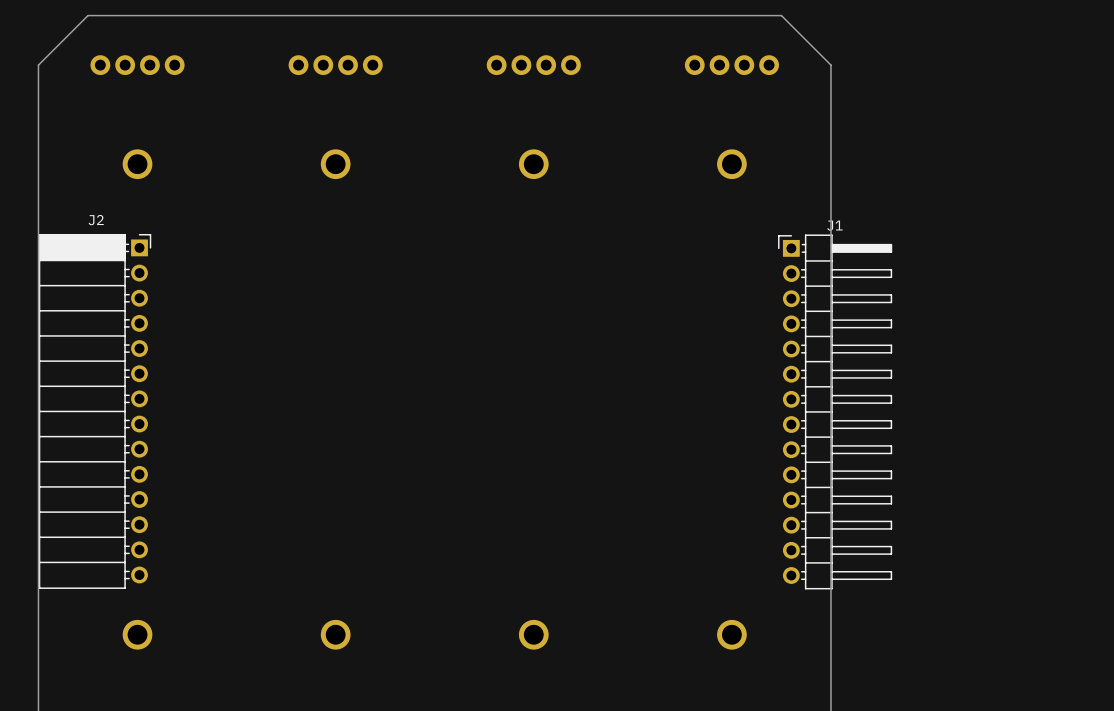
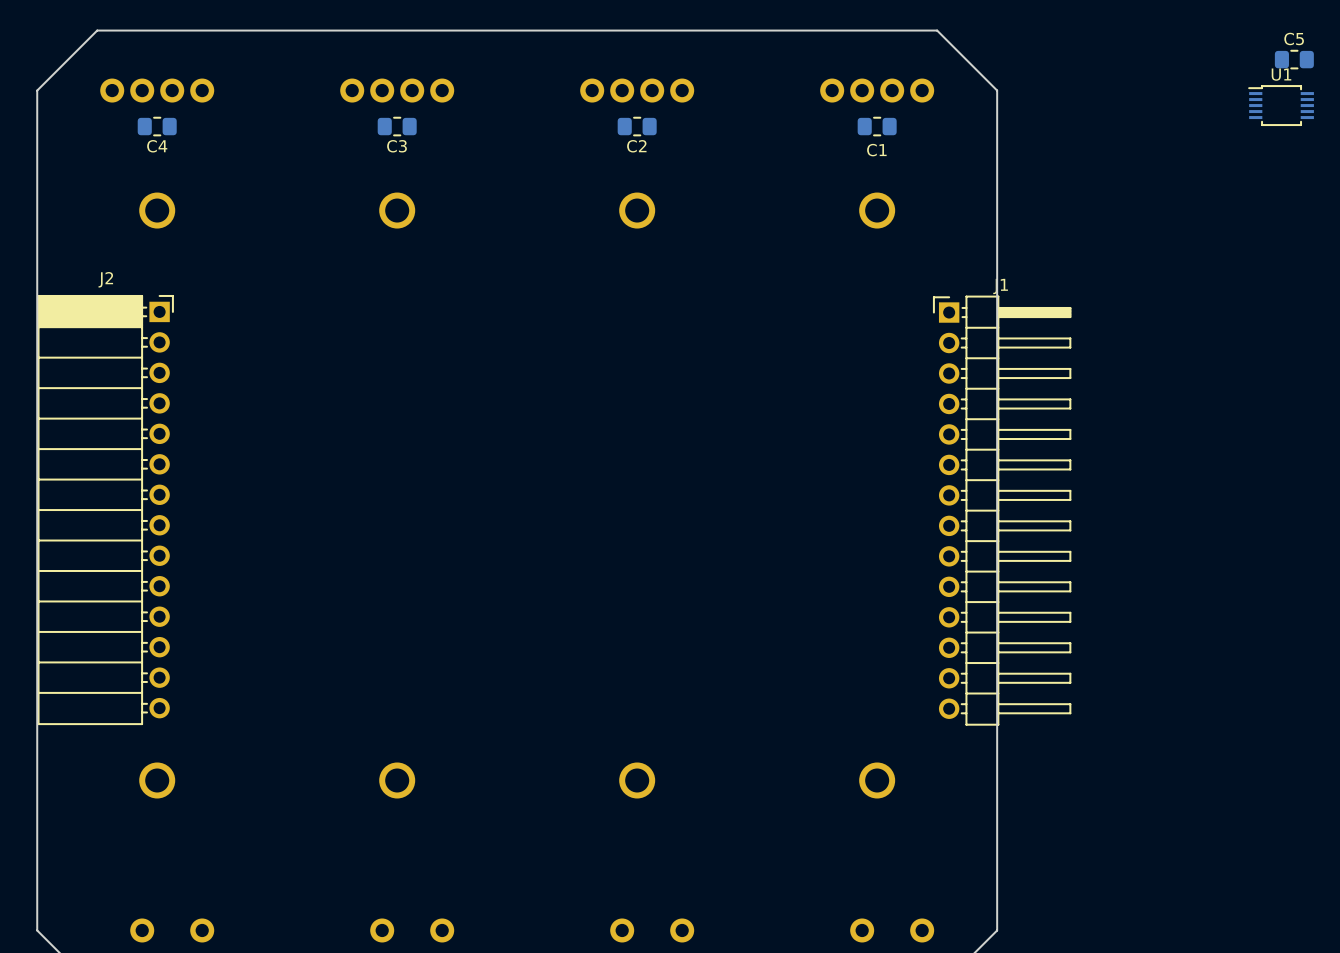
C5: none -> (1294, 59)
U1: none -> (1281, 105)
C4: none -> (157, 126)
C3: none -> (397, 126)
C2: none -> (637, 126)
C1: none -> (877, 126)

